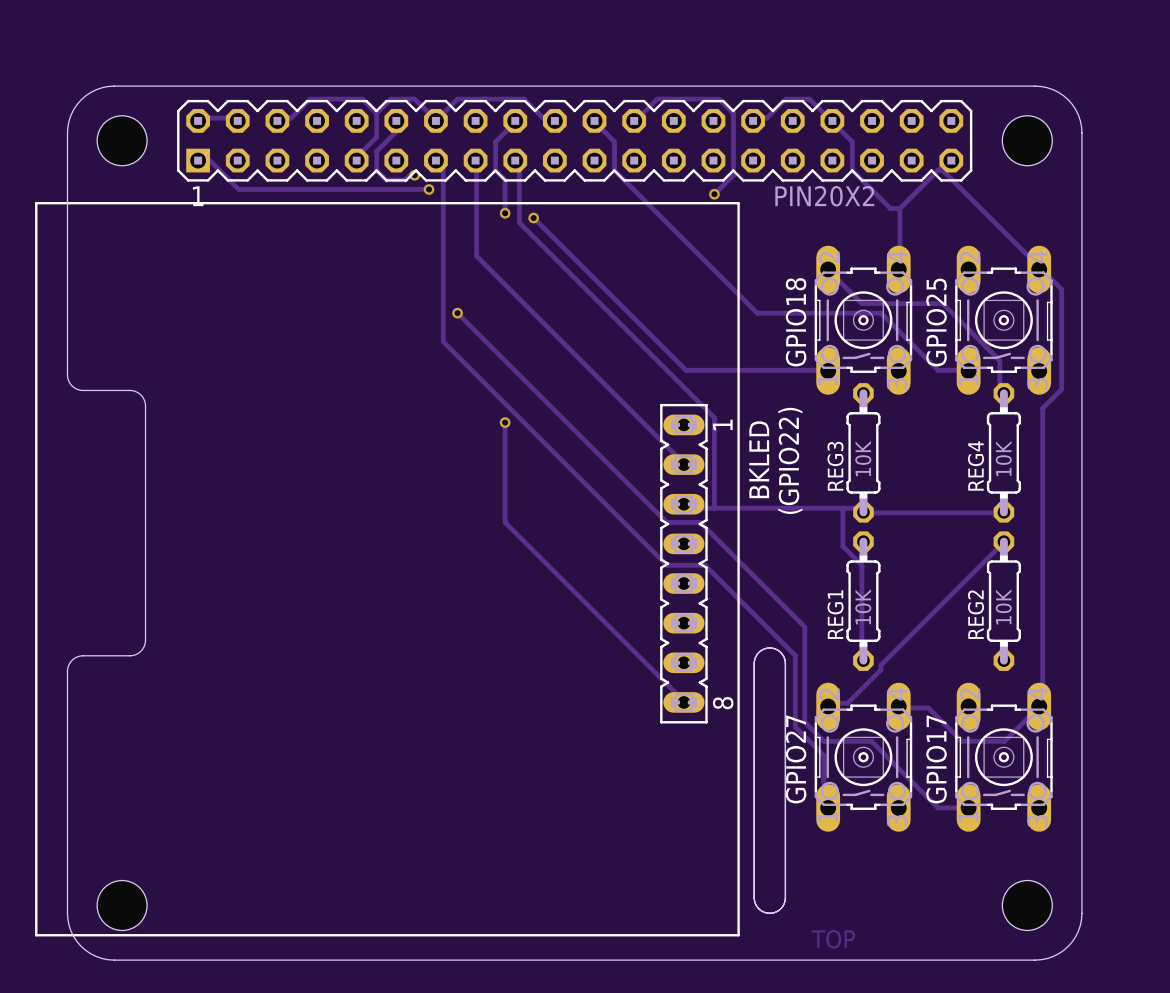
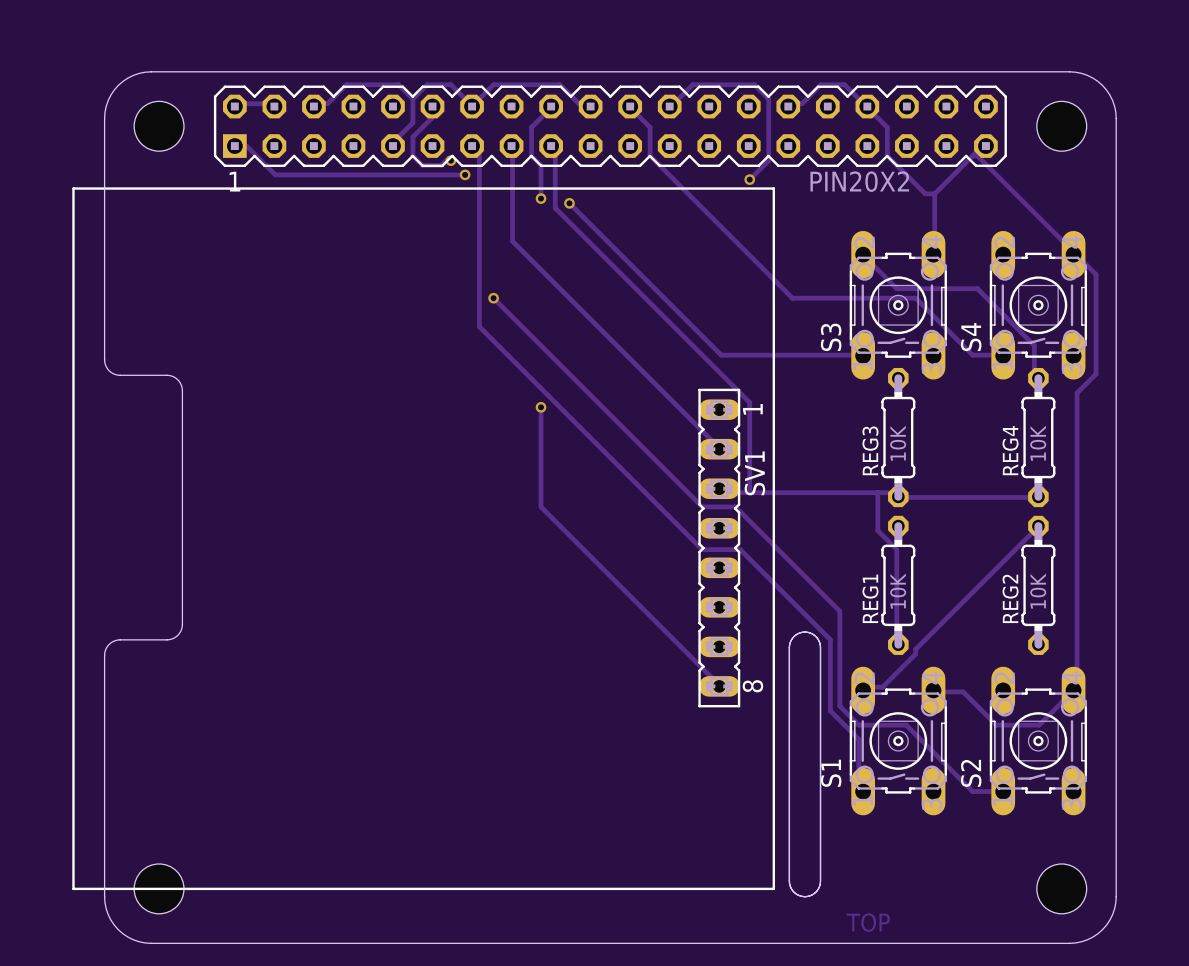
GPIO18 name: GPIO18 (796, 322) -> S3 (831, 337)
GPIO25 name: GPIO25 (936, 322) -> S4 (971, 337)
text: BKLED (759, 459) -> none
text: (GPIO22) (790, 460) -> none
part: (683, 563) -> none
SV1: none -> (719, 548)
GPIO27 name: GPIO27 (796, 759) -> S1 (831, 773)
GPIO17 name: GPIO17 (936, 759) -> S2 (971, 773)
line: (36, 905) (36, 935) (738, 935) (738, 905) -> (73, 888) (773, 888)

